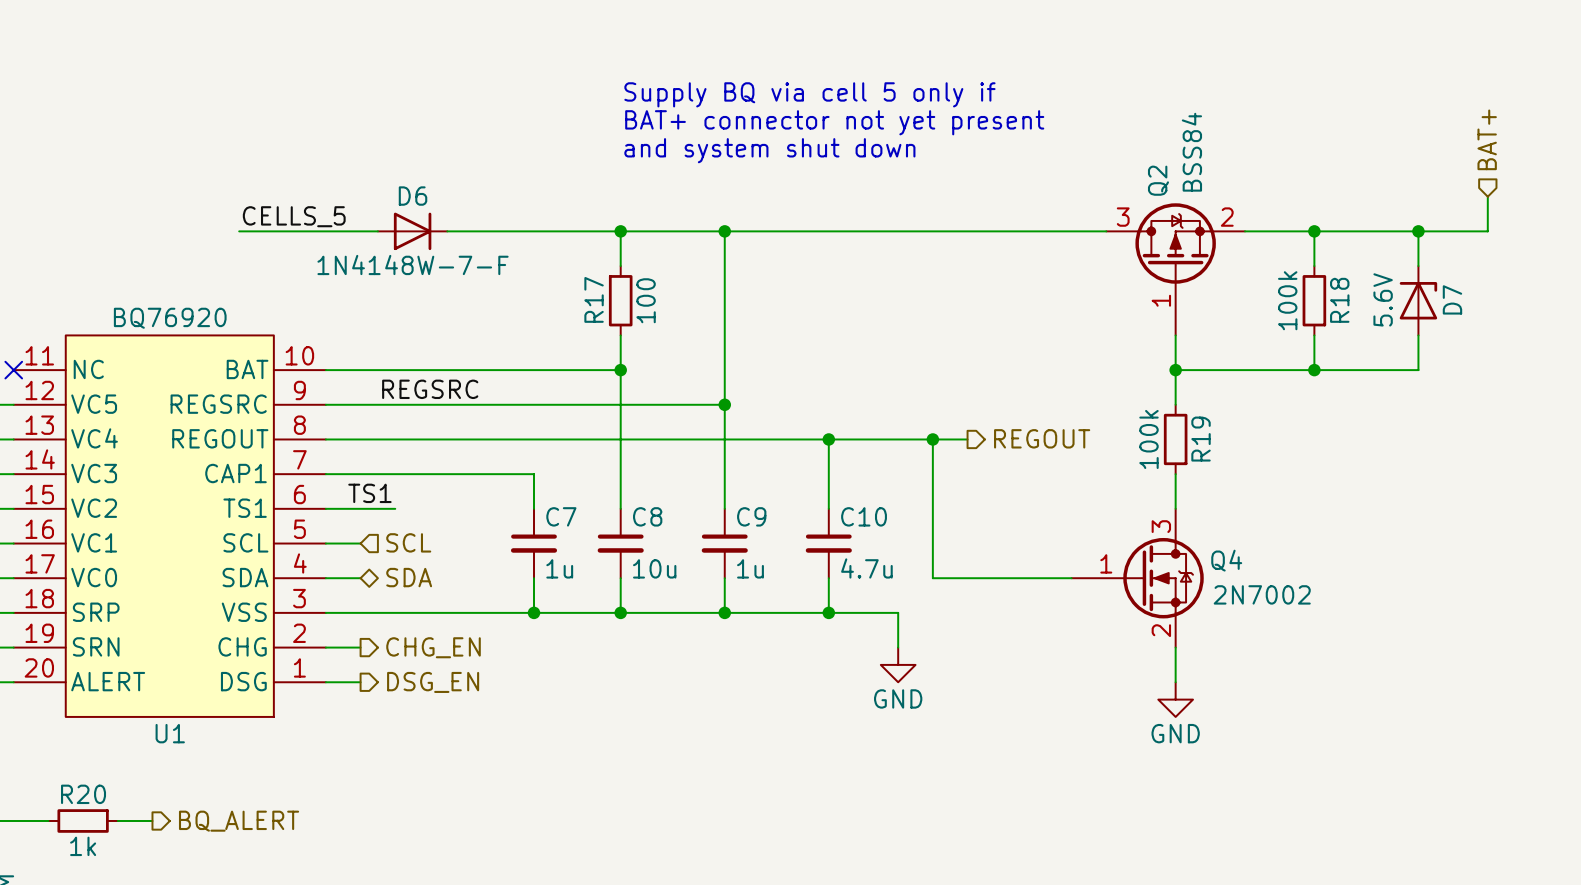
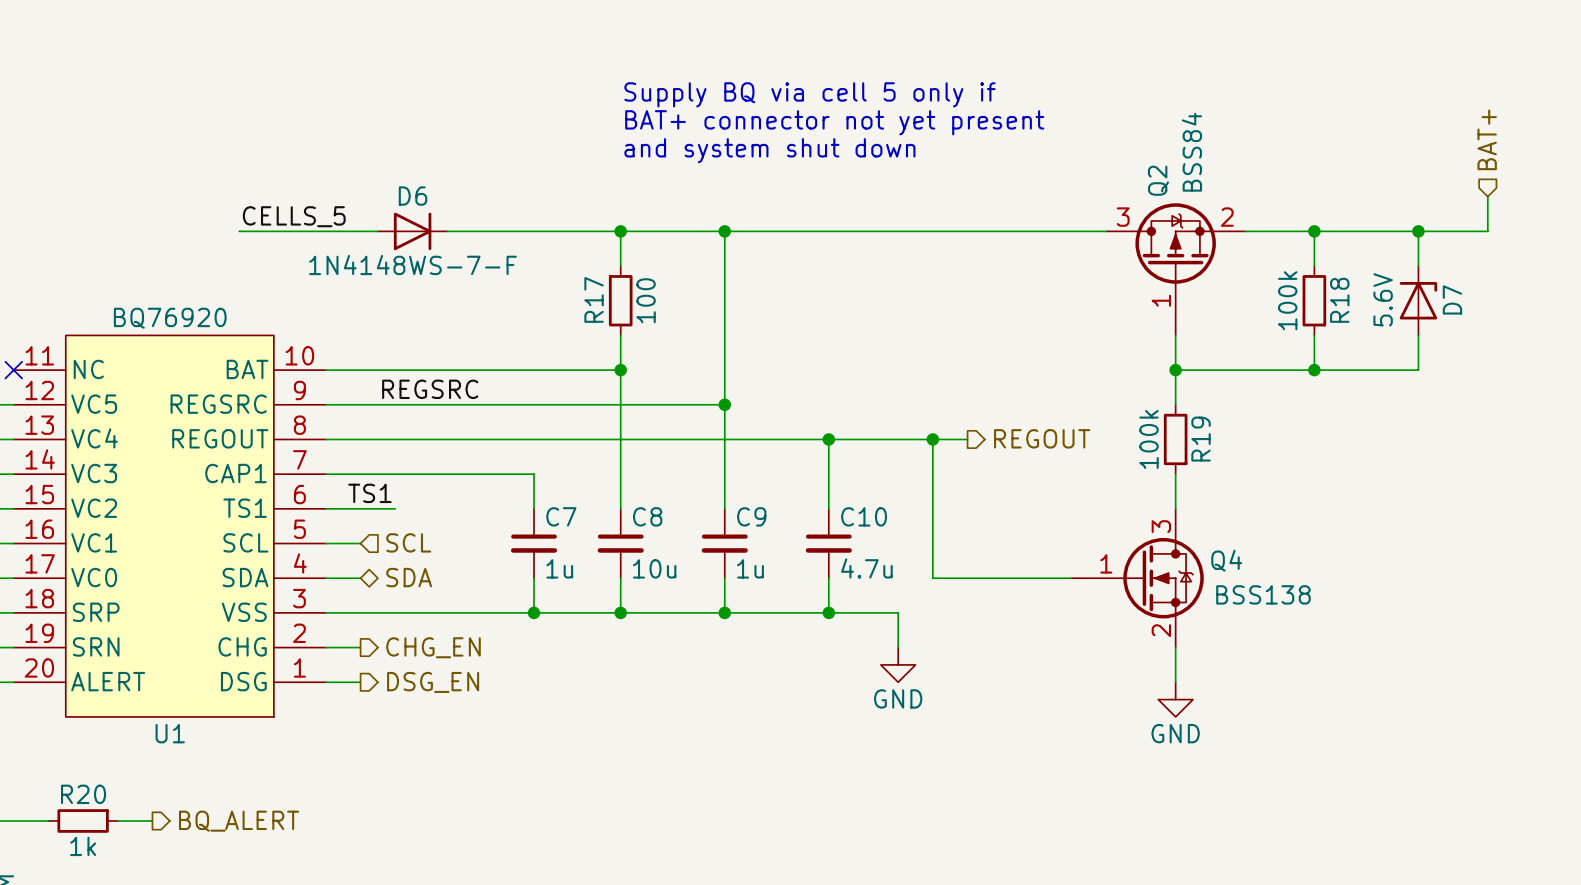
D6 value: 1N4148W-7-F (413, 264) -> 1N4148WS-7-F (413, 264)
Q4 value: 2N7002 (1262, 594) -> BSS138 (1263, 594)

